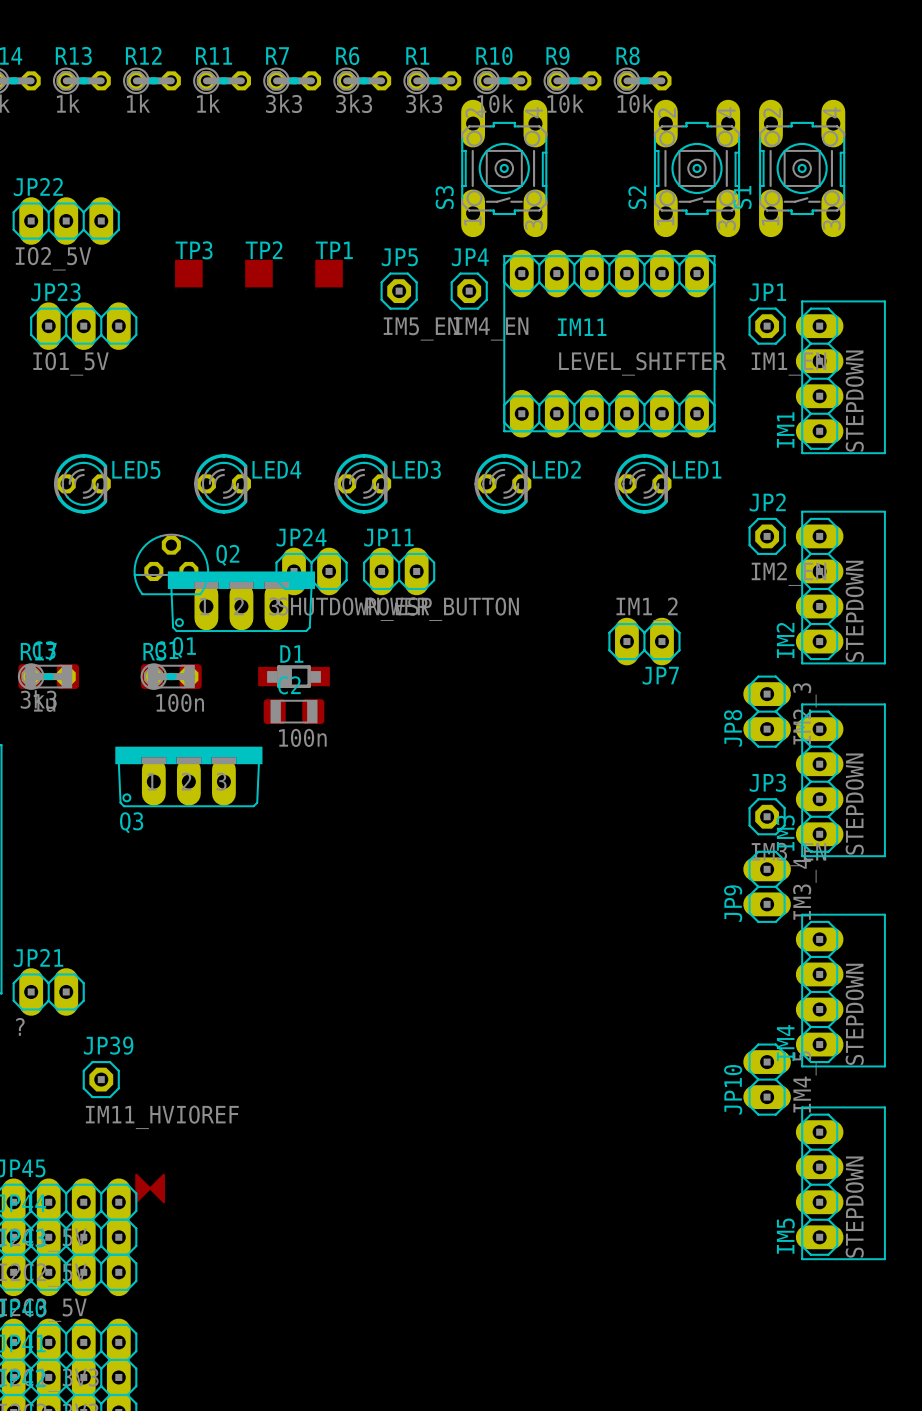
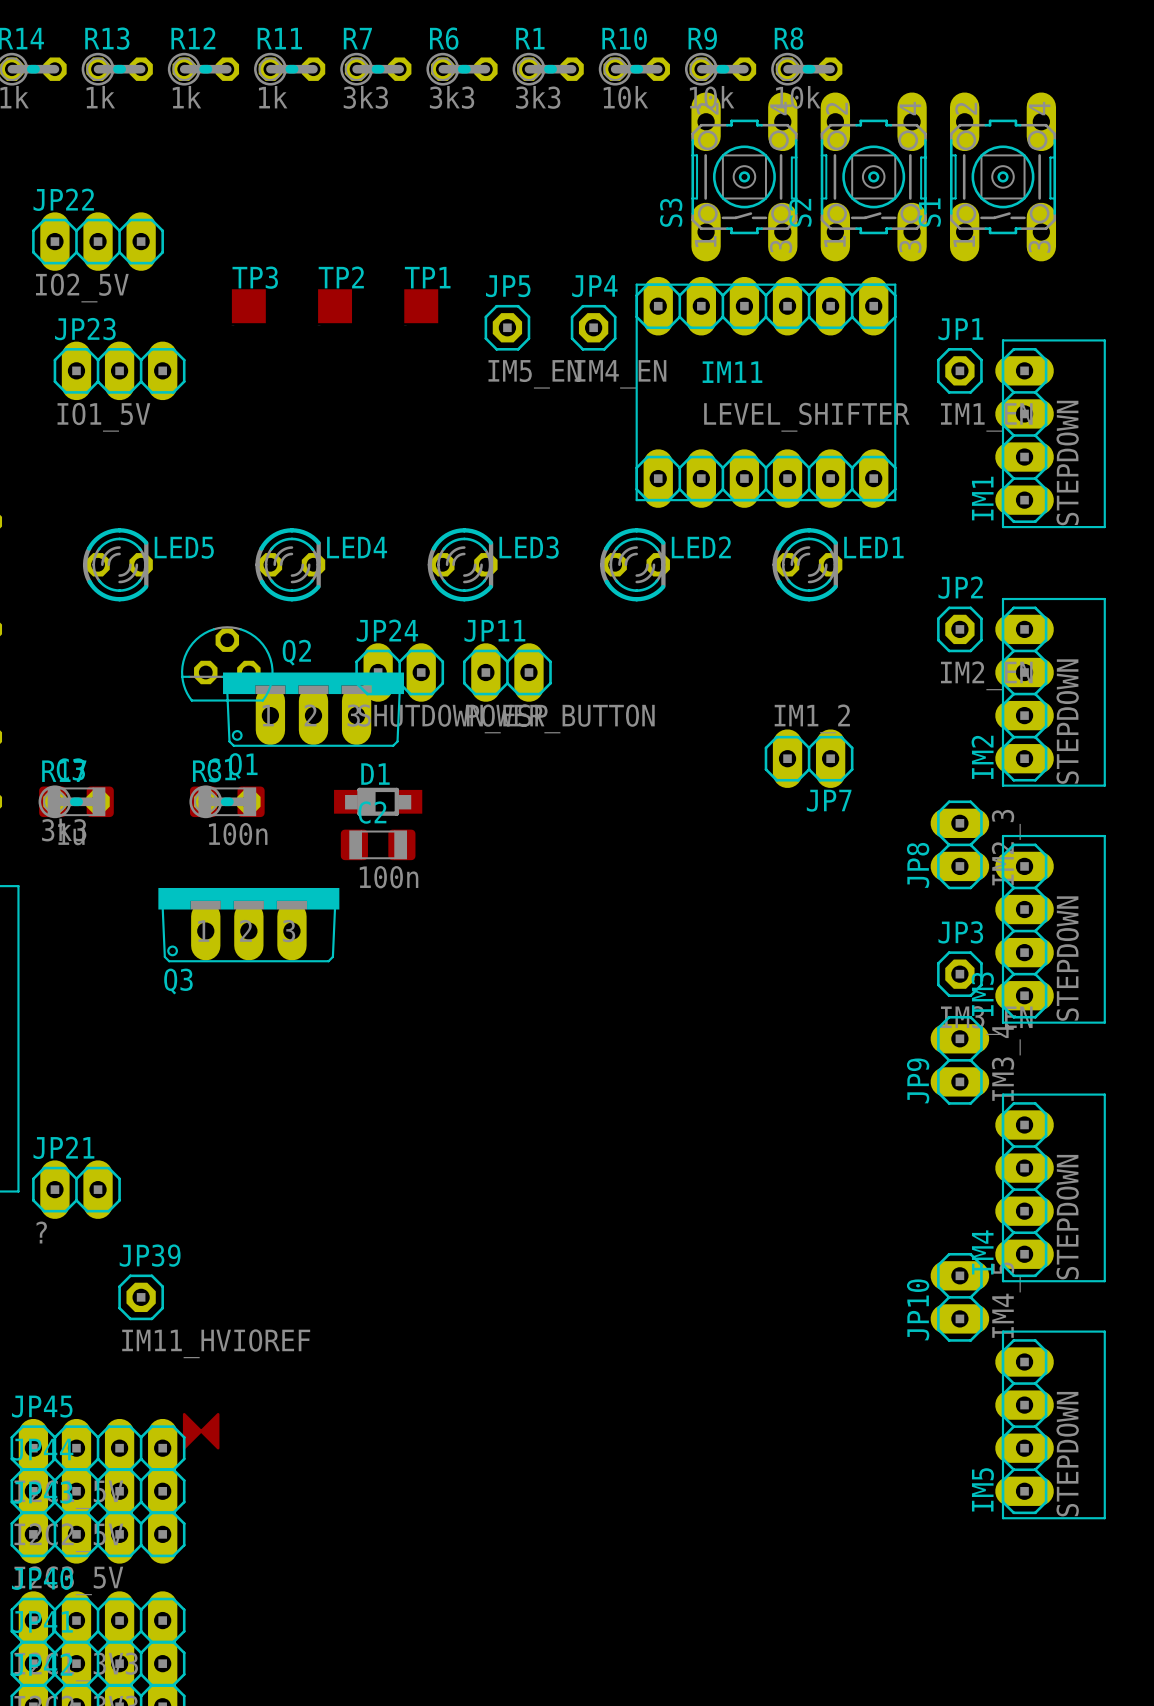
S3 position: (504, 168) -> (744, 176)

